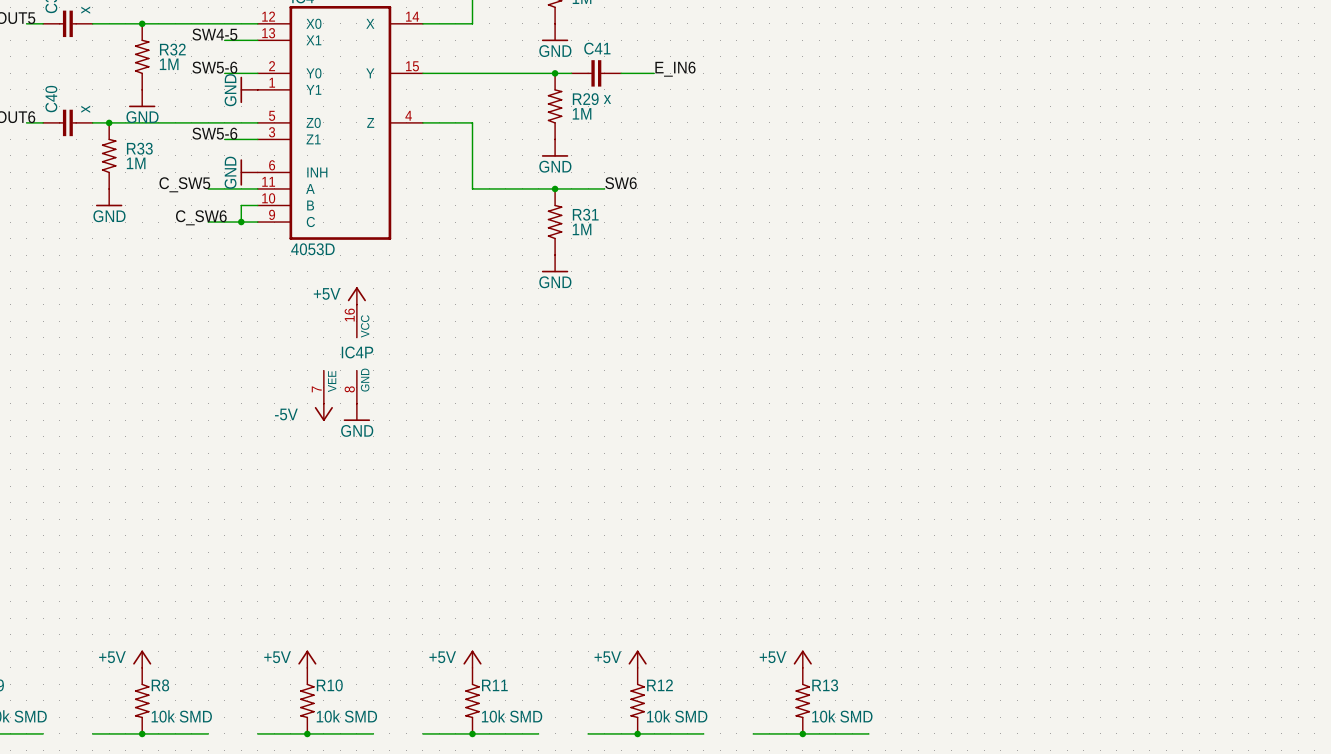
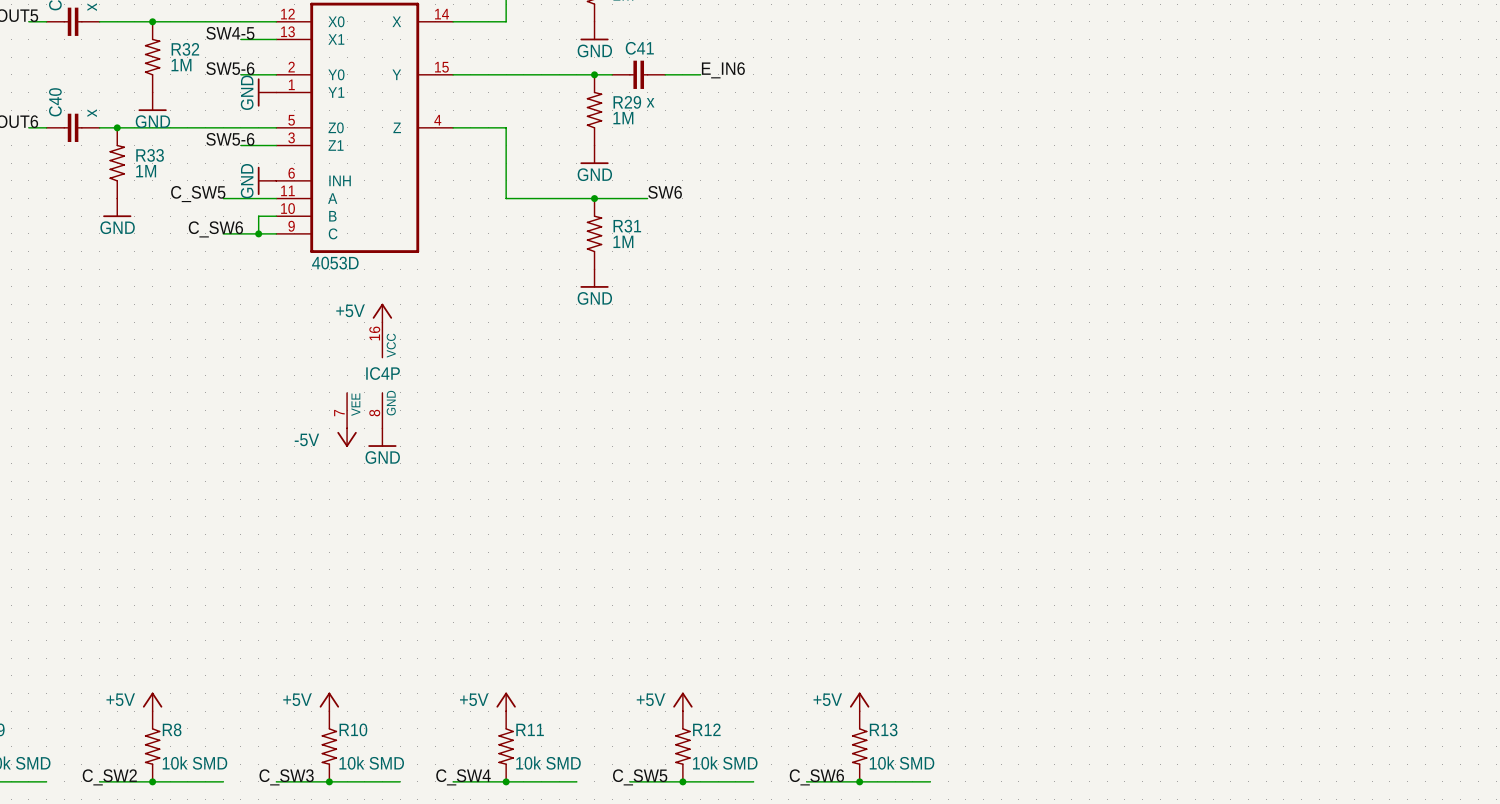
label: none -> C_SW2 (109, 777)
label: none -> C_SW3 (286, 777)
label: none -> C_SW4 (463, 777)
label: none -> C_SW5 (640, 777)
label: none -> C_SW6 (816, 777)

